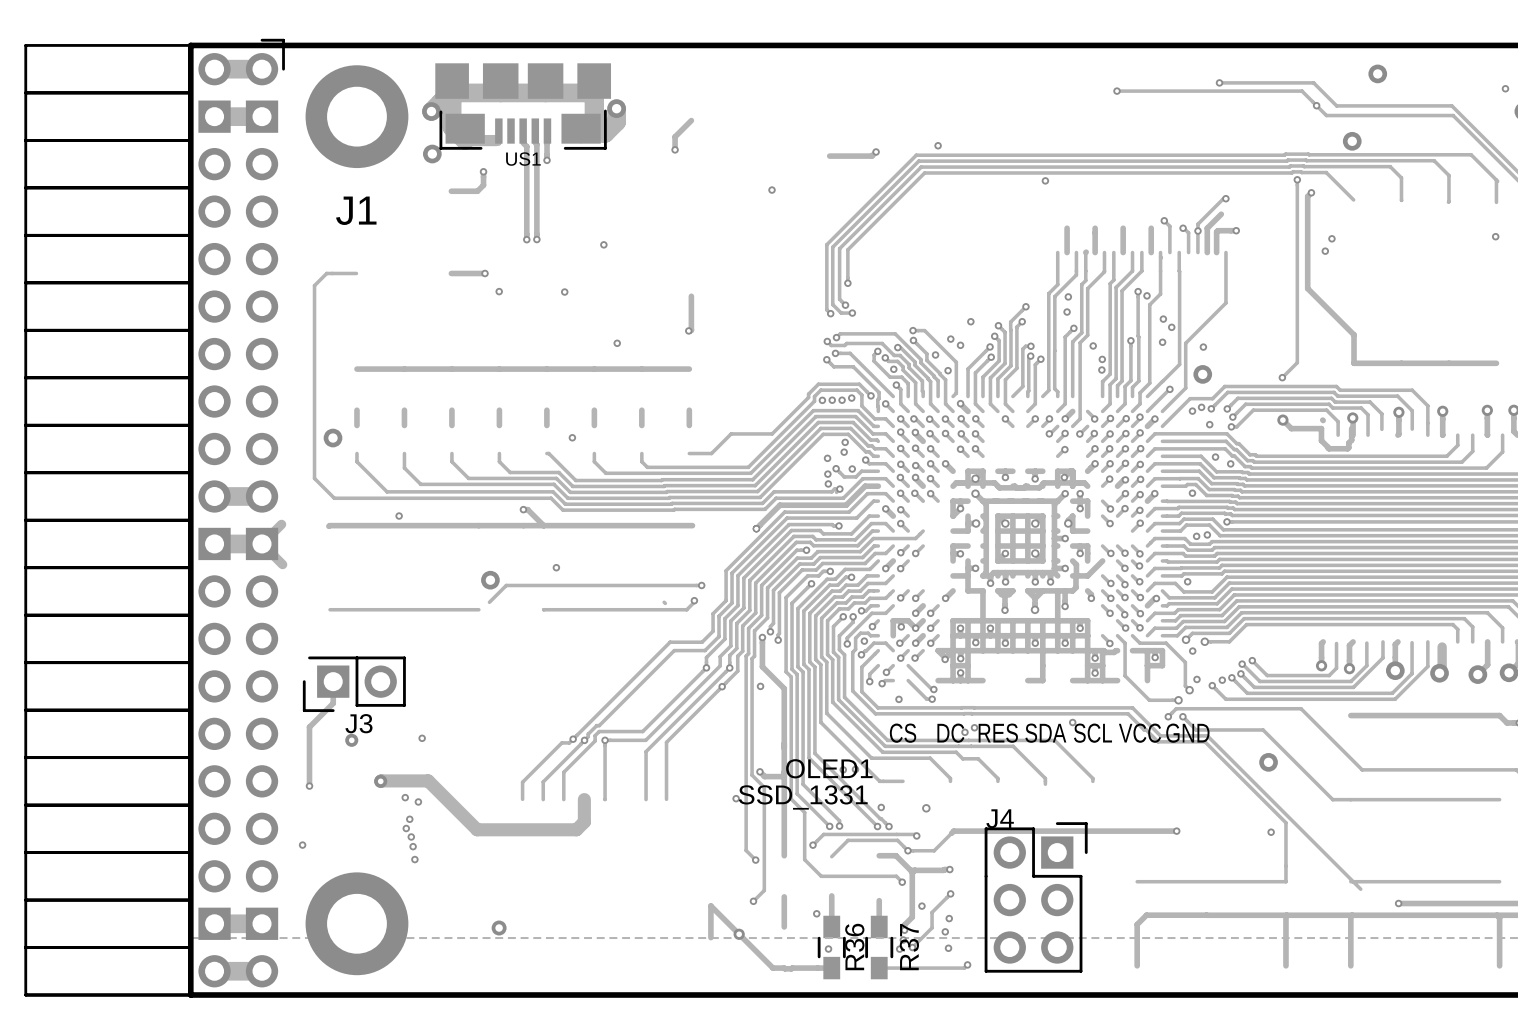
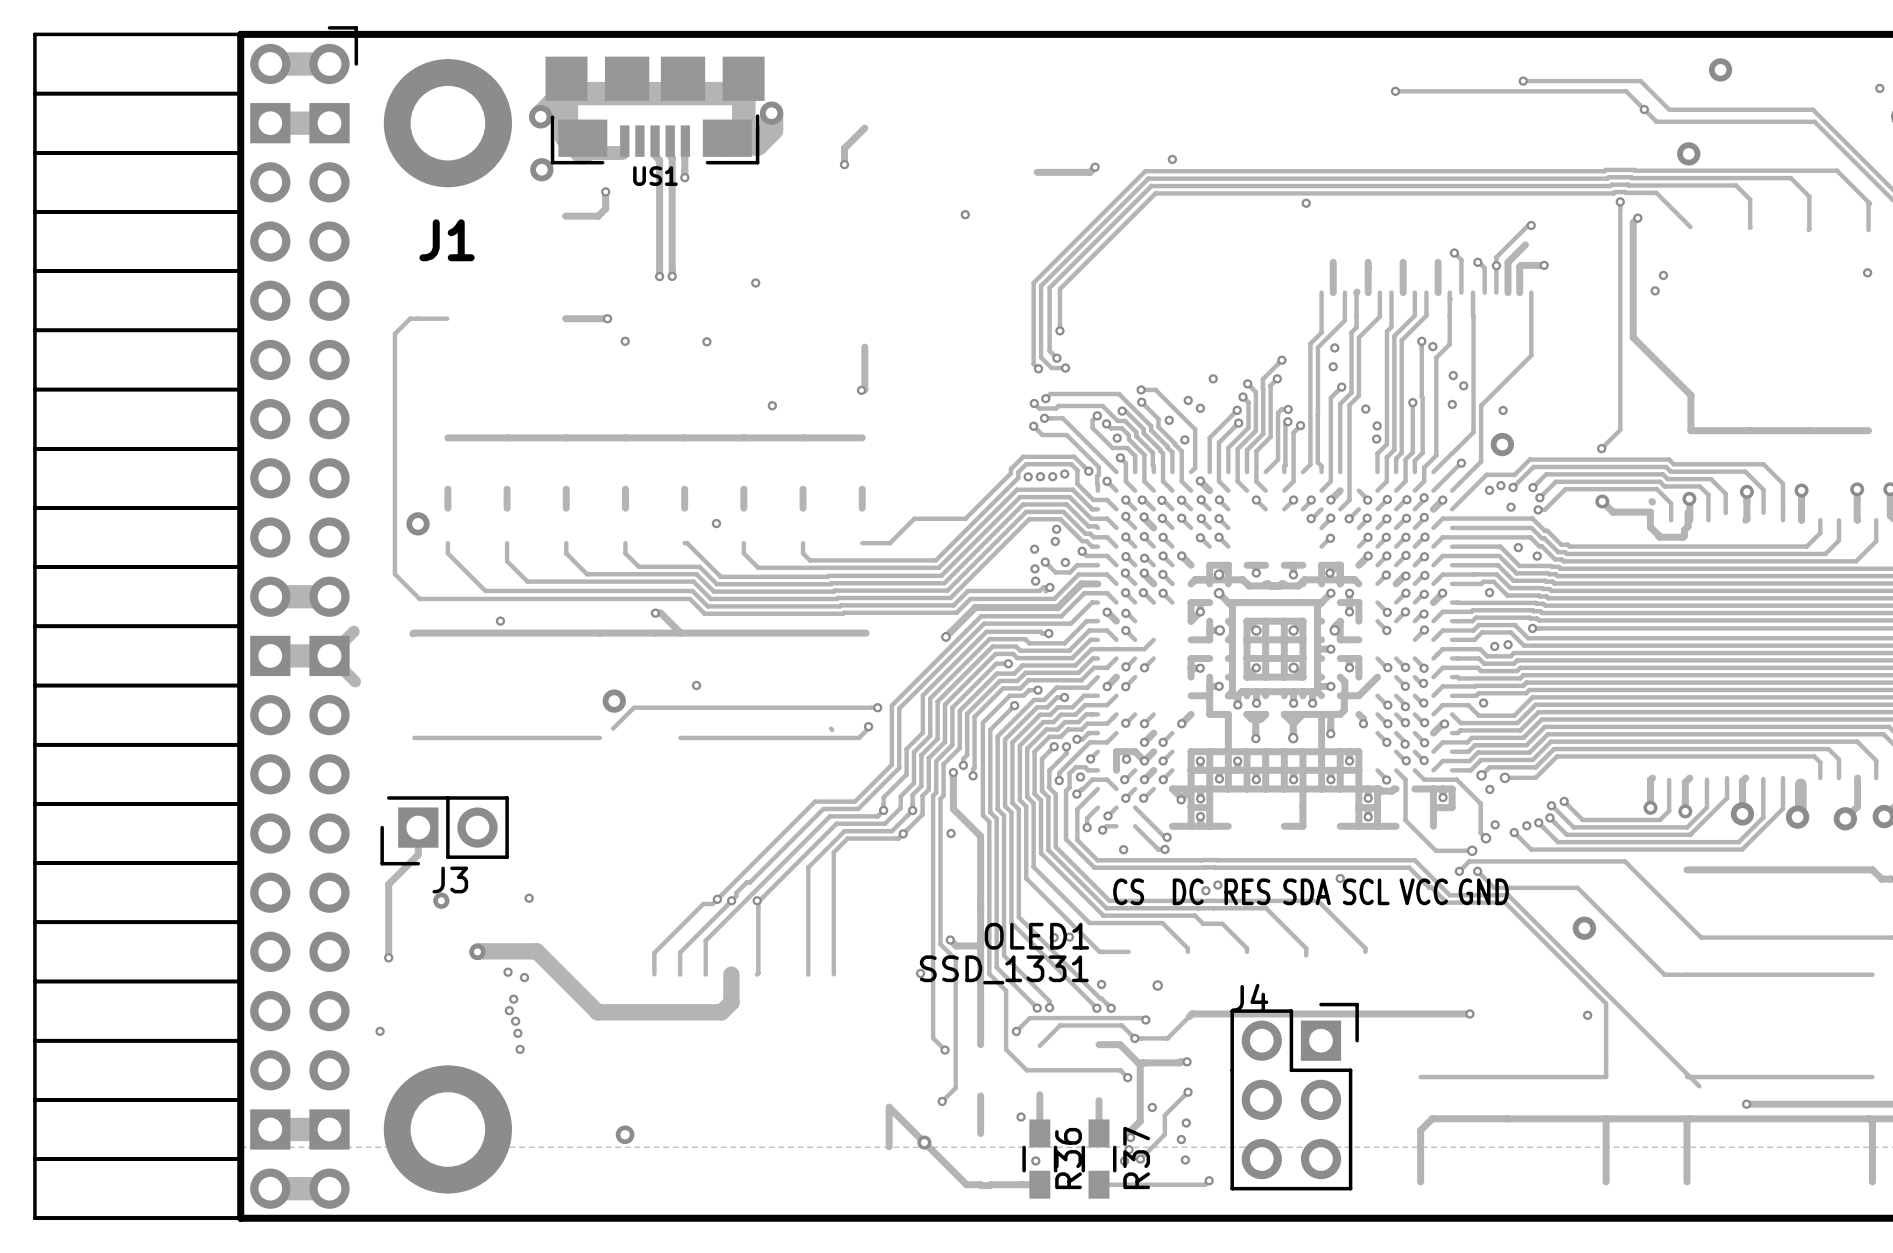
track: (726, 570) (726, 600) (713, 613) -> (908, 689) (891, 705) (891, 742)
track: (732, 573) (732, 603) (718, 616) -> (915, 692) (899, 708) (899, 745)
track: (718, 633) (718, 636) (705, 650) (674, 650) (658, 666) -> (899, 768) (858, 808) (823, 808)
track: (702, 642) (670, 642) (651, 660) -> (878, 778) (855, 801) (815, 801)
track: (701, 672) (642, 731) (599, 731) (595, 735) (595, 741) -> (877, 816) (830, 816) (744, 901)
track: (707, 678) (645, 740) (605, 740) (605, 799) -> (884, 823) (836, 823) (758, 901) (757, 974)
track: (713, 684) (646, 751) -> (892, 831) (844, 831) (808, 867) (808, 914)
track: (718, 690) (666, 742) -> (898, 838) (847, 838) (833, 852) (833, 903)

